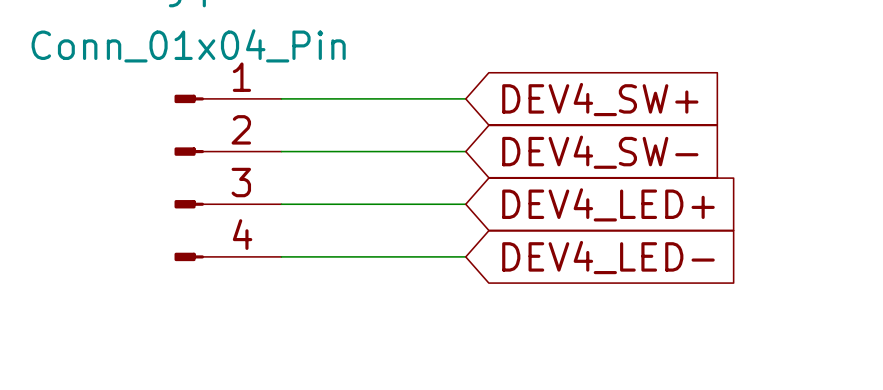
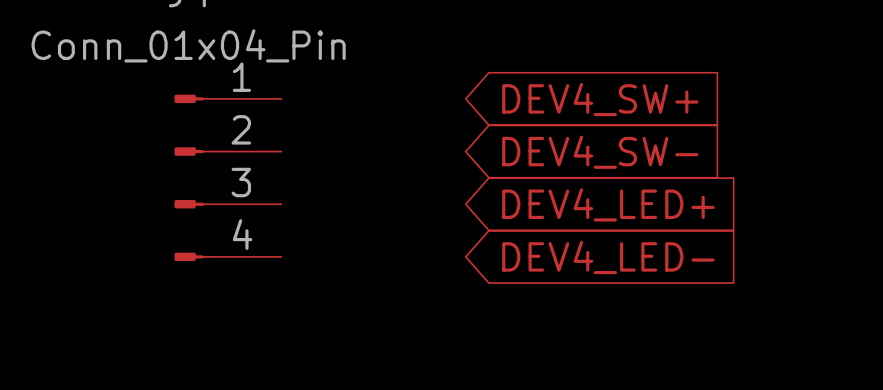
wire: (281, 98) (465, 98) -> none
wire: (281, 151) (465, 151) -> none
wire: (281, 204) (465, 204) -> none
wire: (281, 256) (465, 256) -> none

